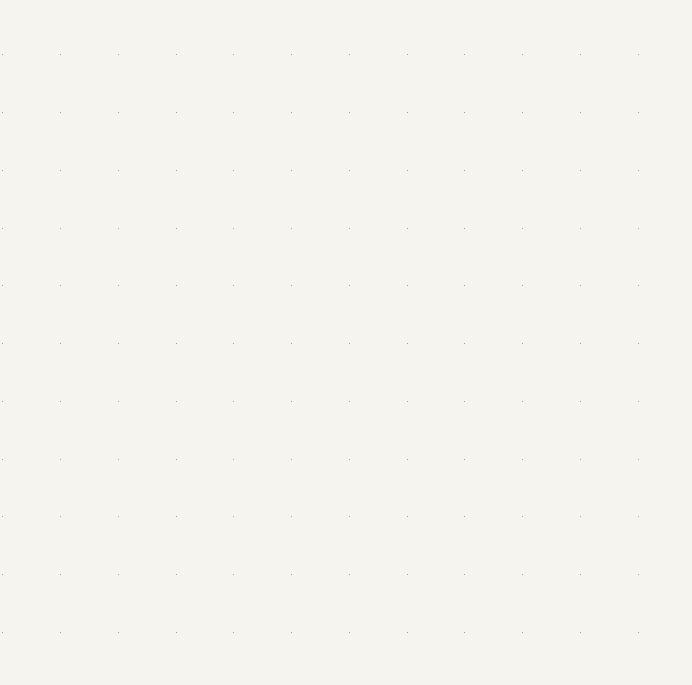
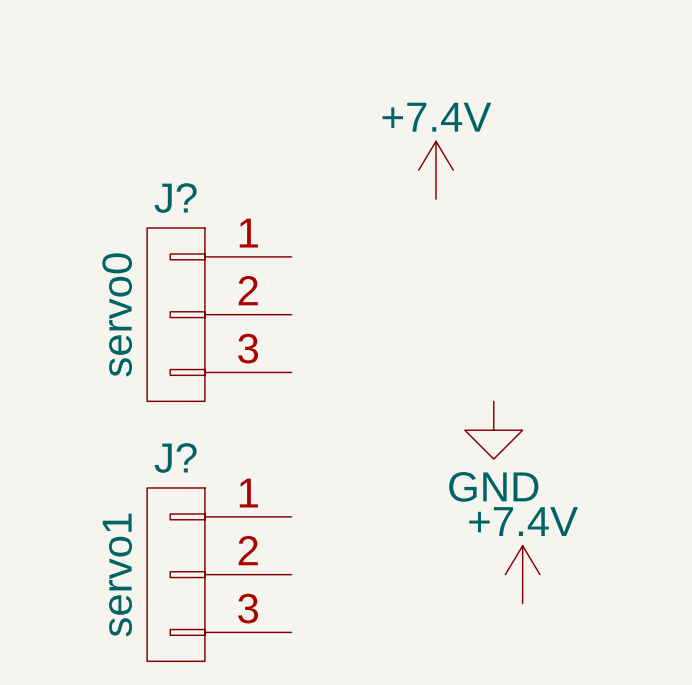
power symbol: none -> +7.4V (435, 170)
J?: none -> servo0 (219, 314)
power symbol: none -> GND (493, 430)
J?: none -> servo1 (219, 574)
power symbol: none -> +7.4V (522, 574)

